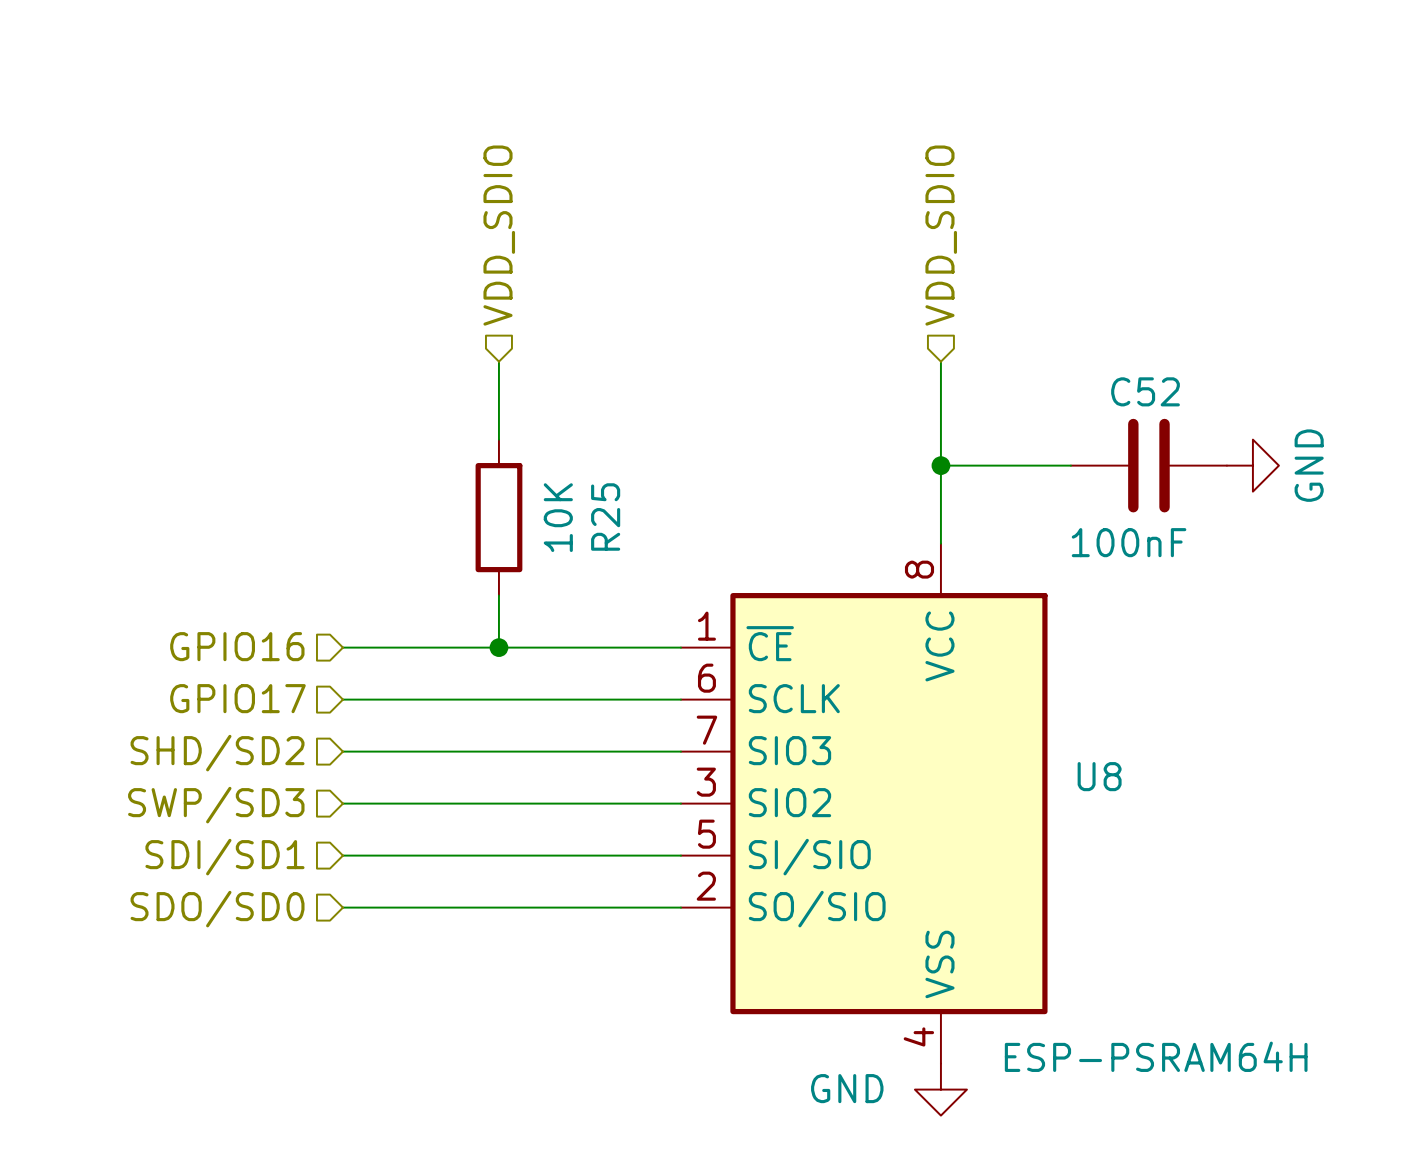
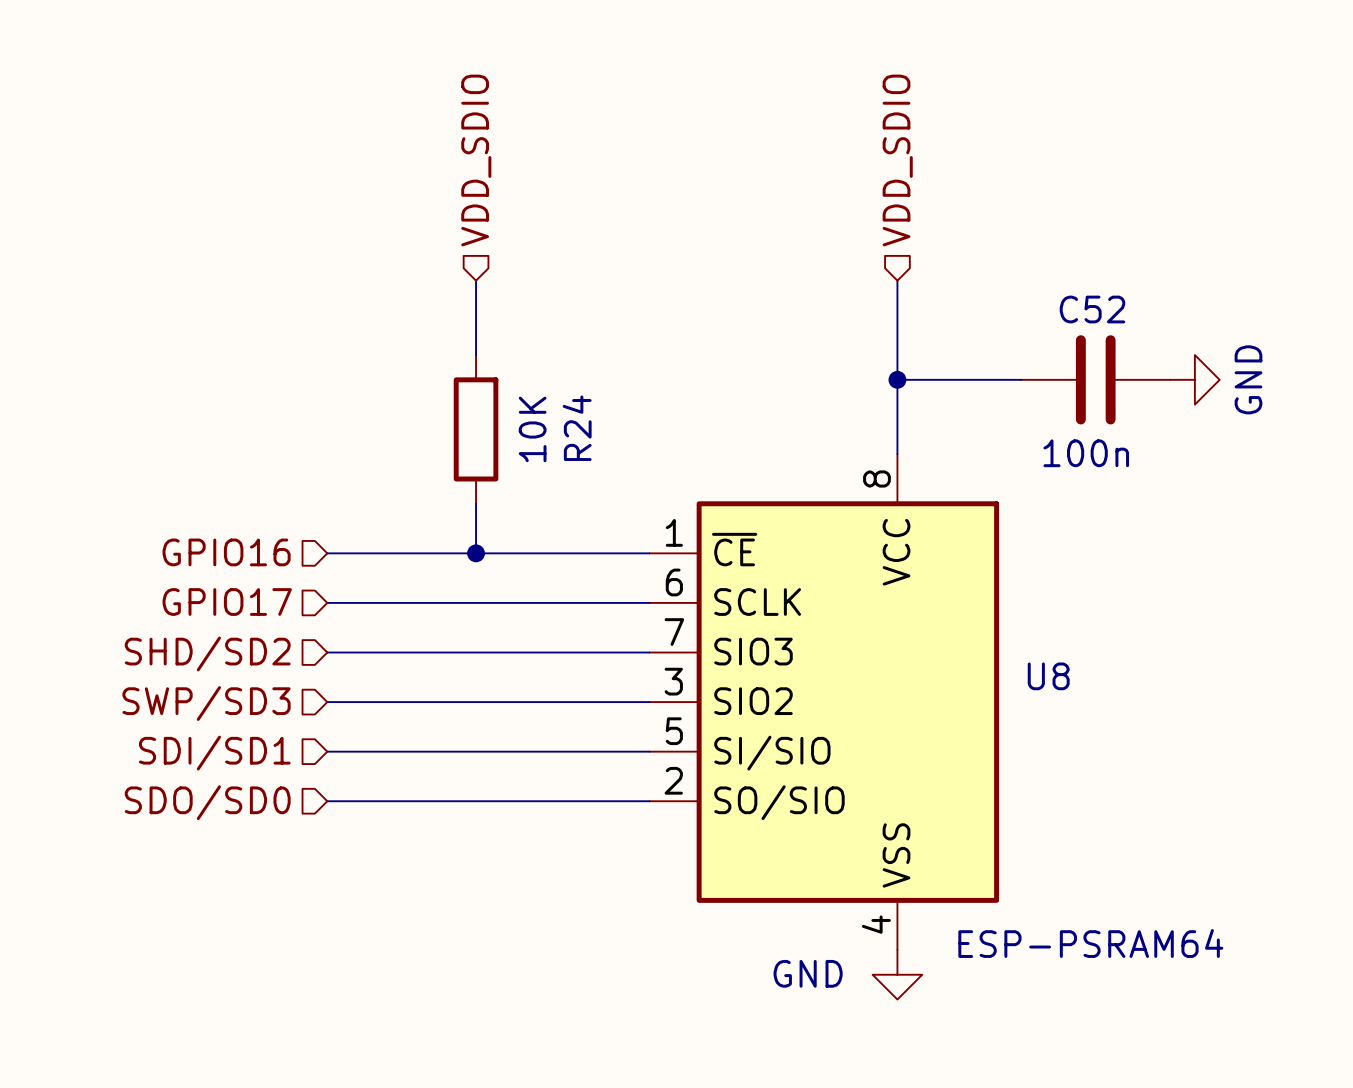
R25 name: R25 (605, 517) -> R24 (577, 428)
C52 value: 100nF (1129, 542) -> 100n (1086, 453)
U8 value: ESP-PSRAM64H (1156, 1056) -> ESP-PSRAM64 (1090, 943)

